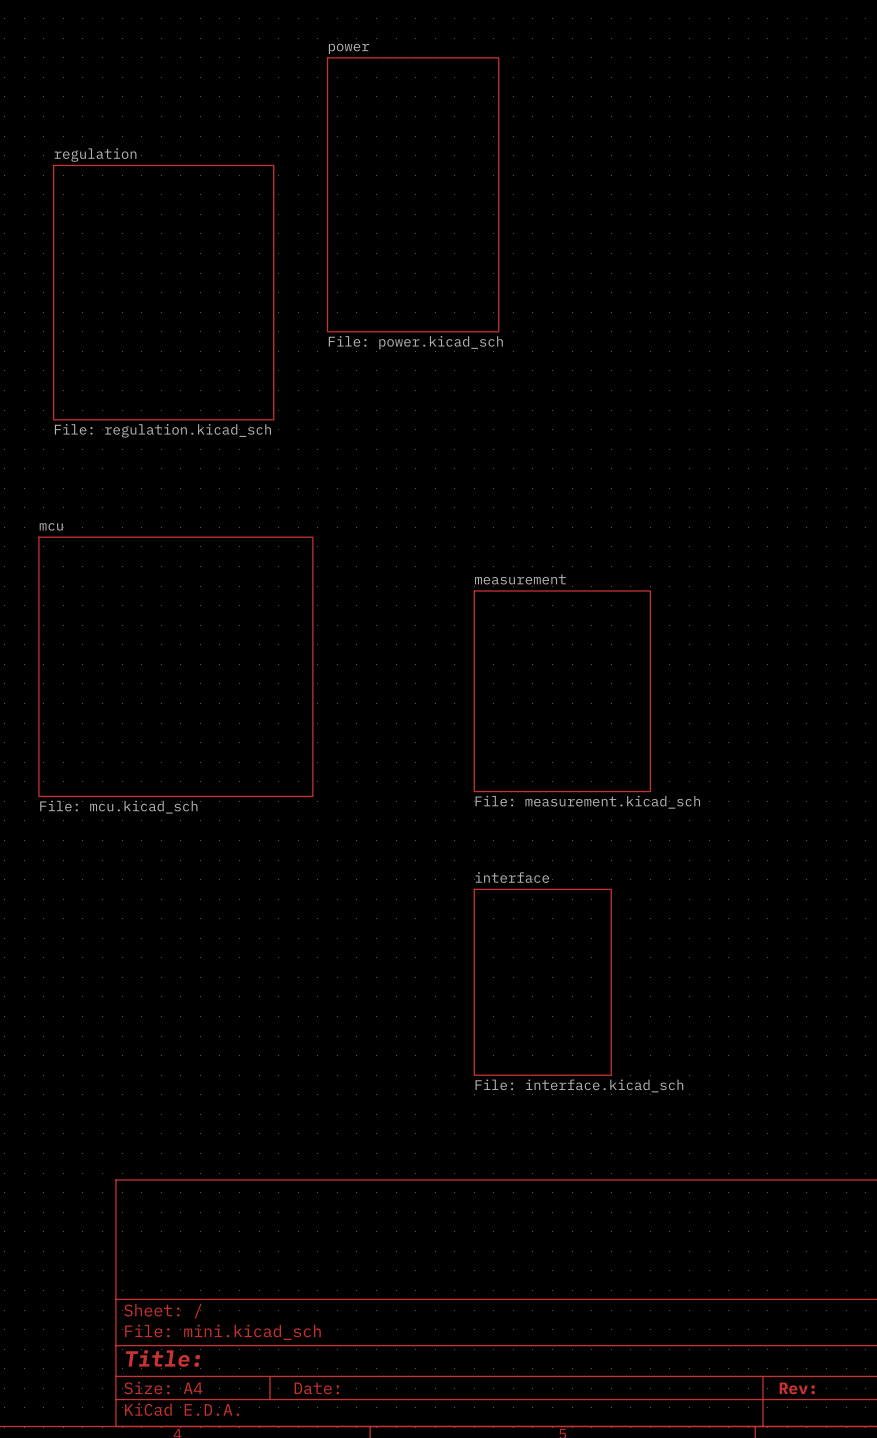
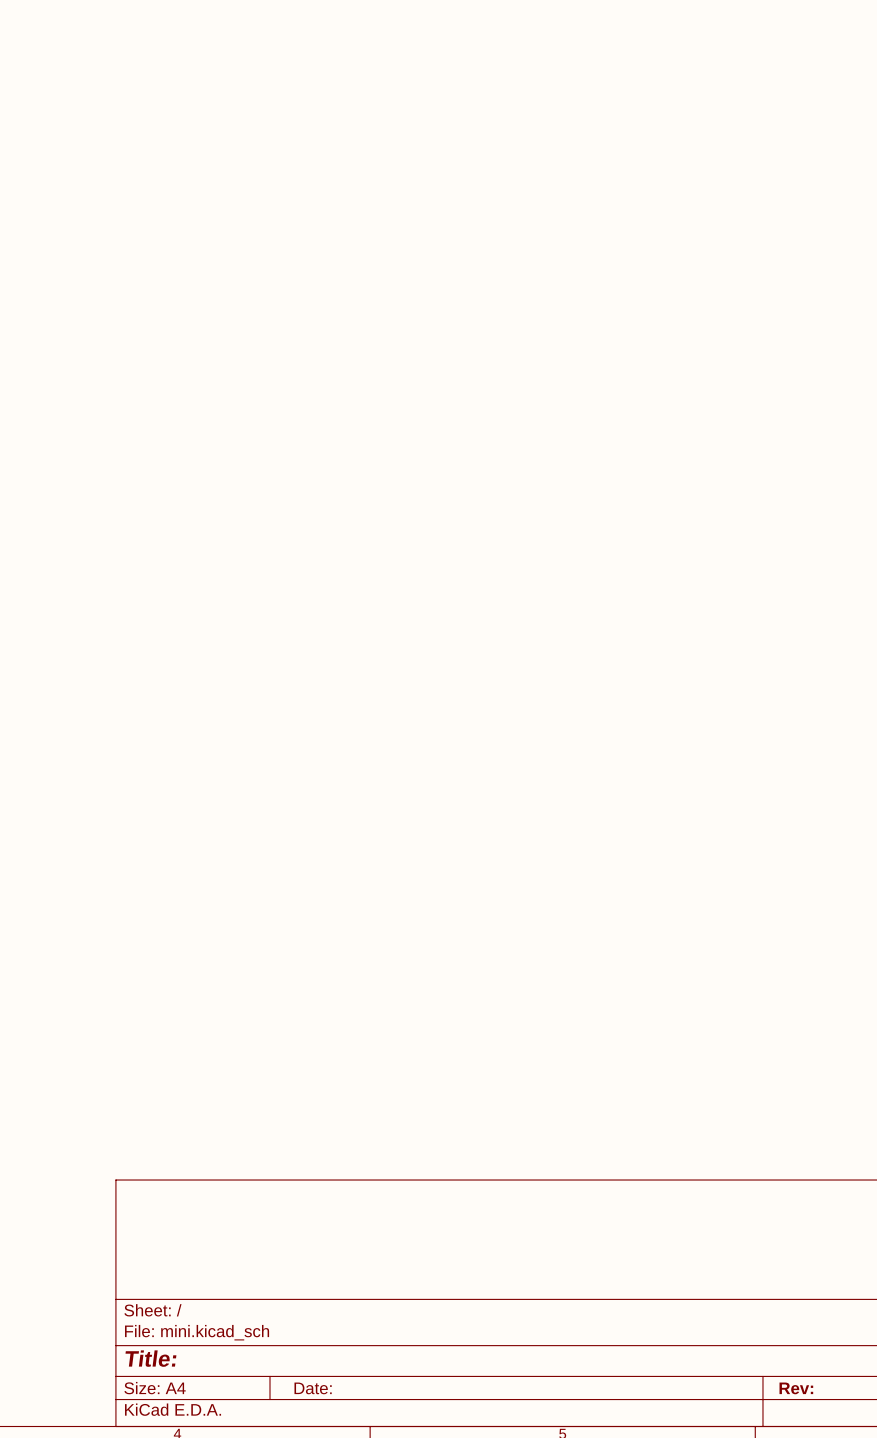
sheet power: File: power.kicad_sch (413, 194) -> none
sheet regulation: File: regulation.kicad_sch (163, 292) -> none
sheet mcu: File: mcu.kicad_sch (175, 666) -> none
sheet measurement: File: measurement.kicad_sch (562, 691) -> none
sheet interface: File: interface.kicad_sch (542, 982) -> none

